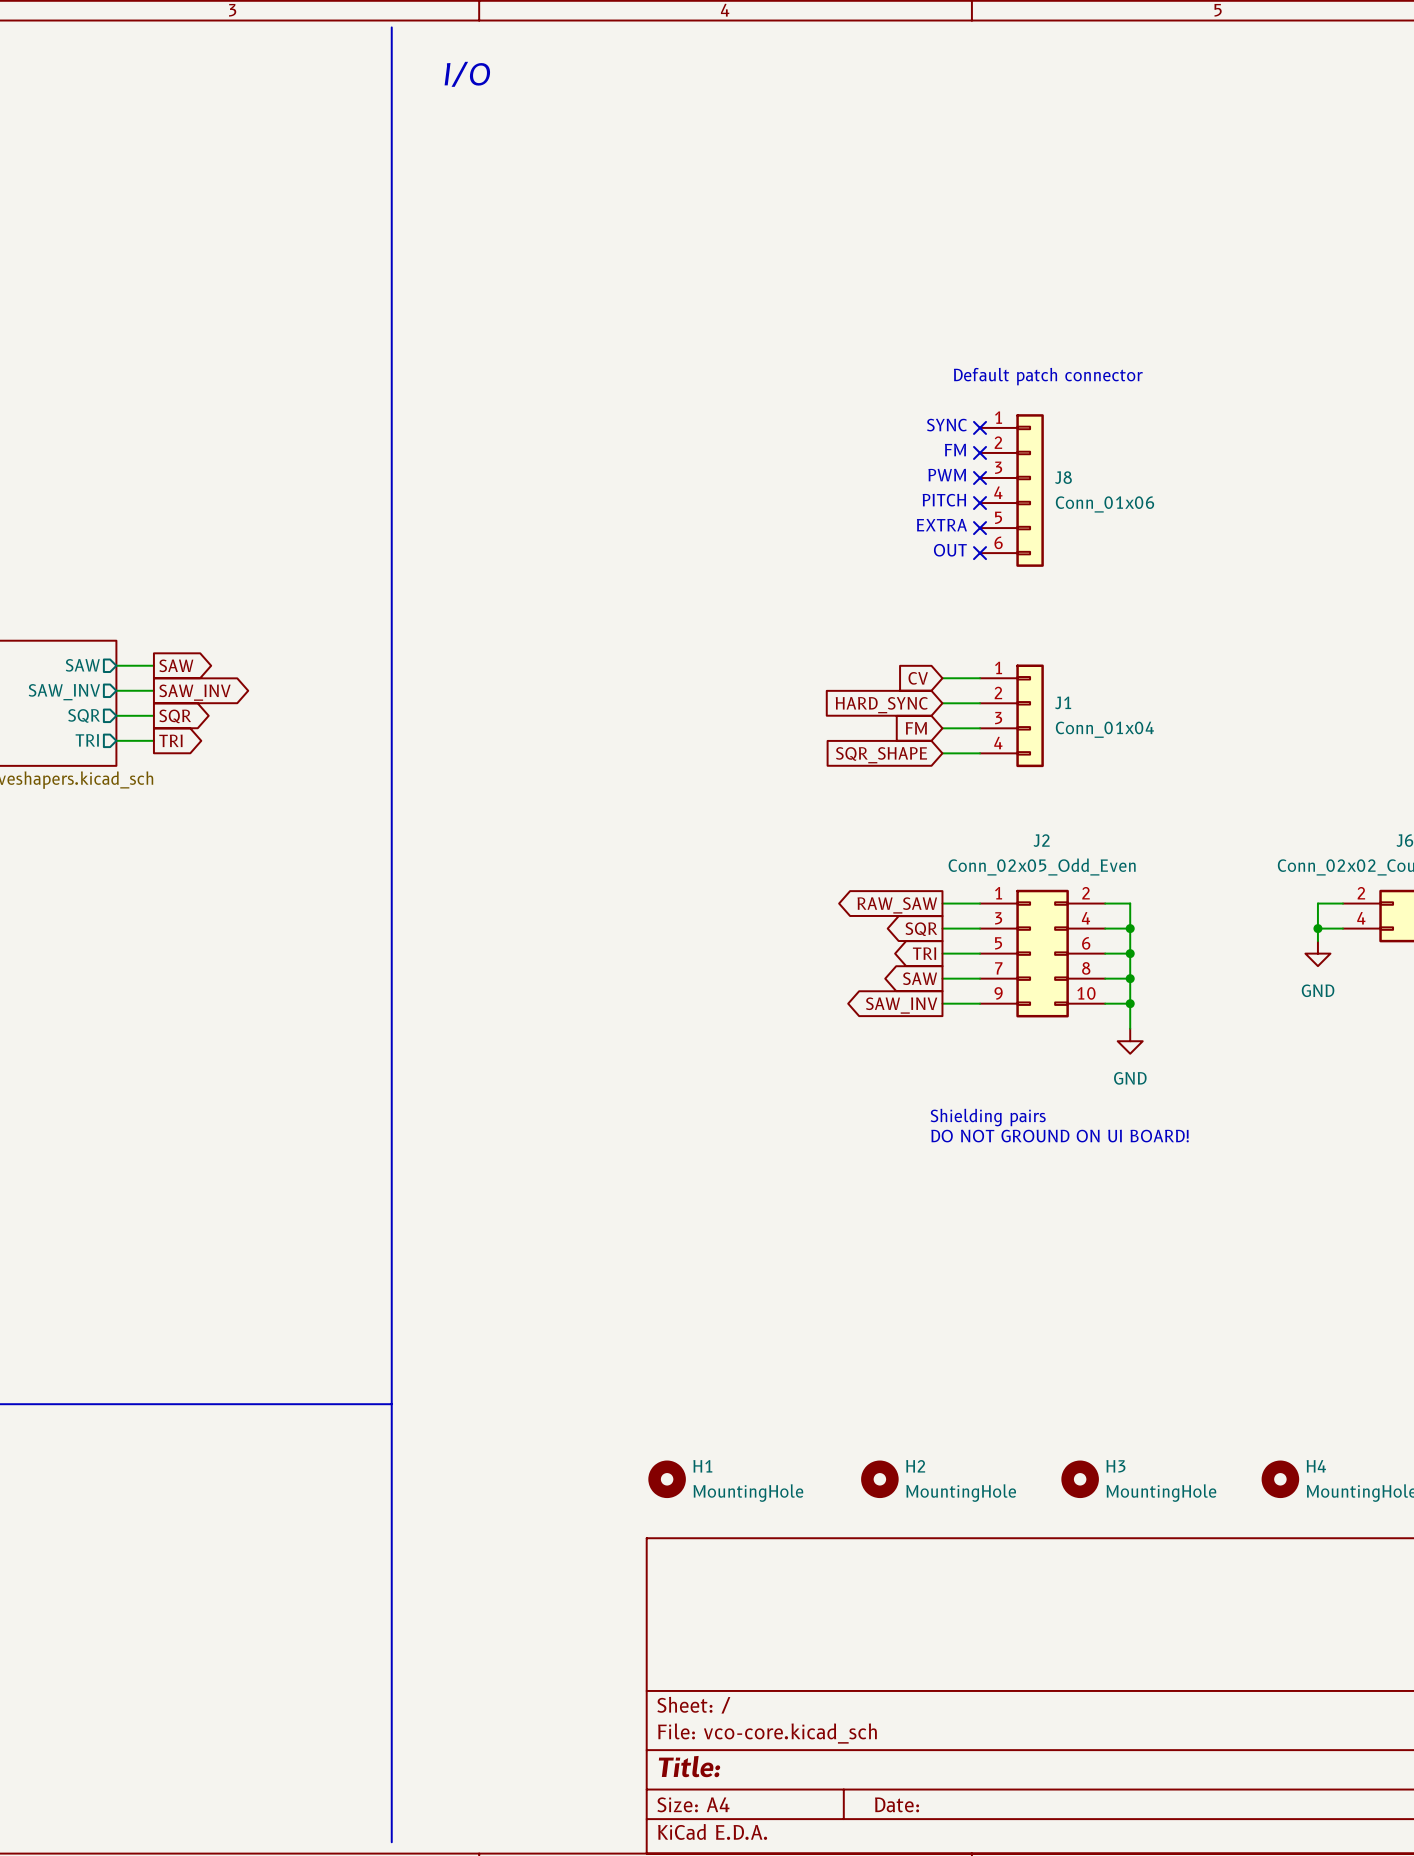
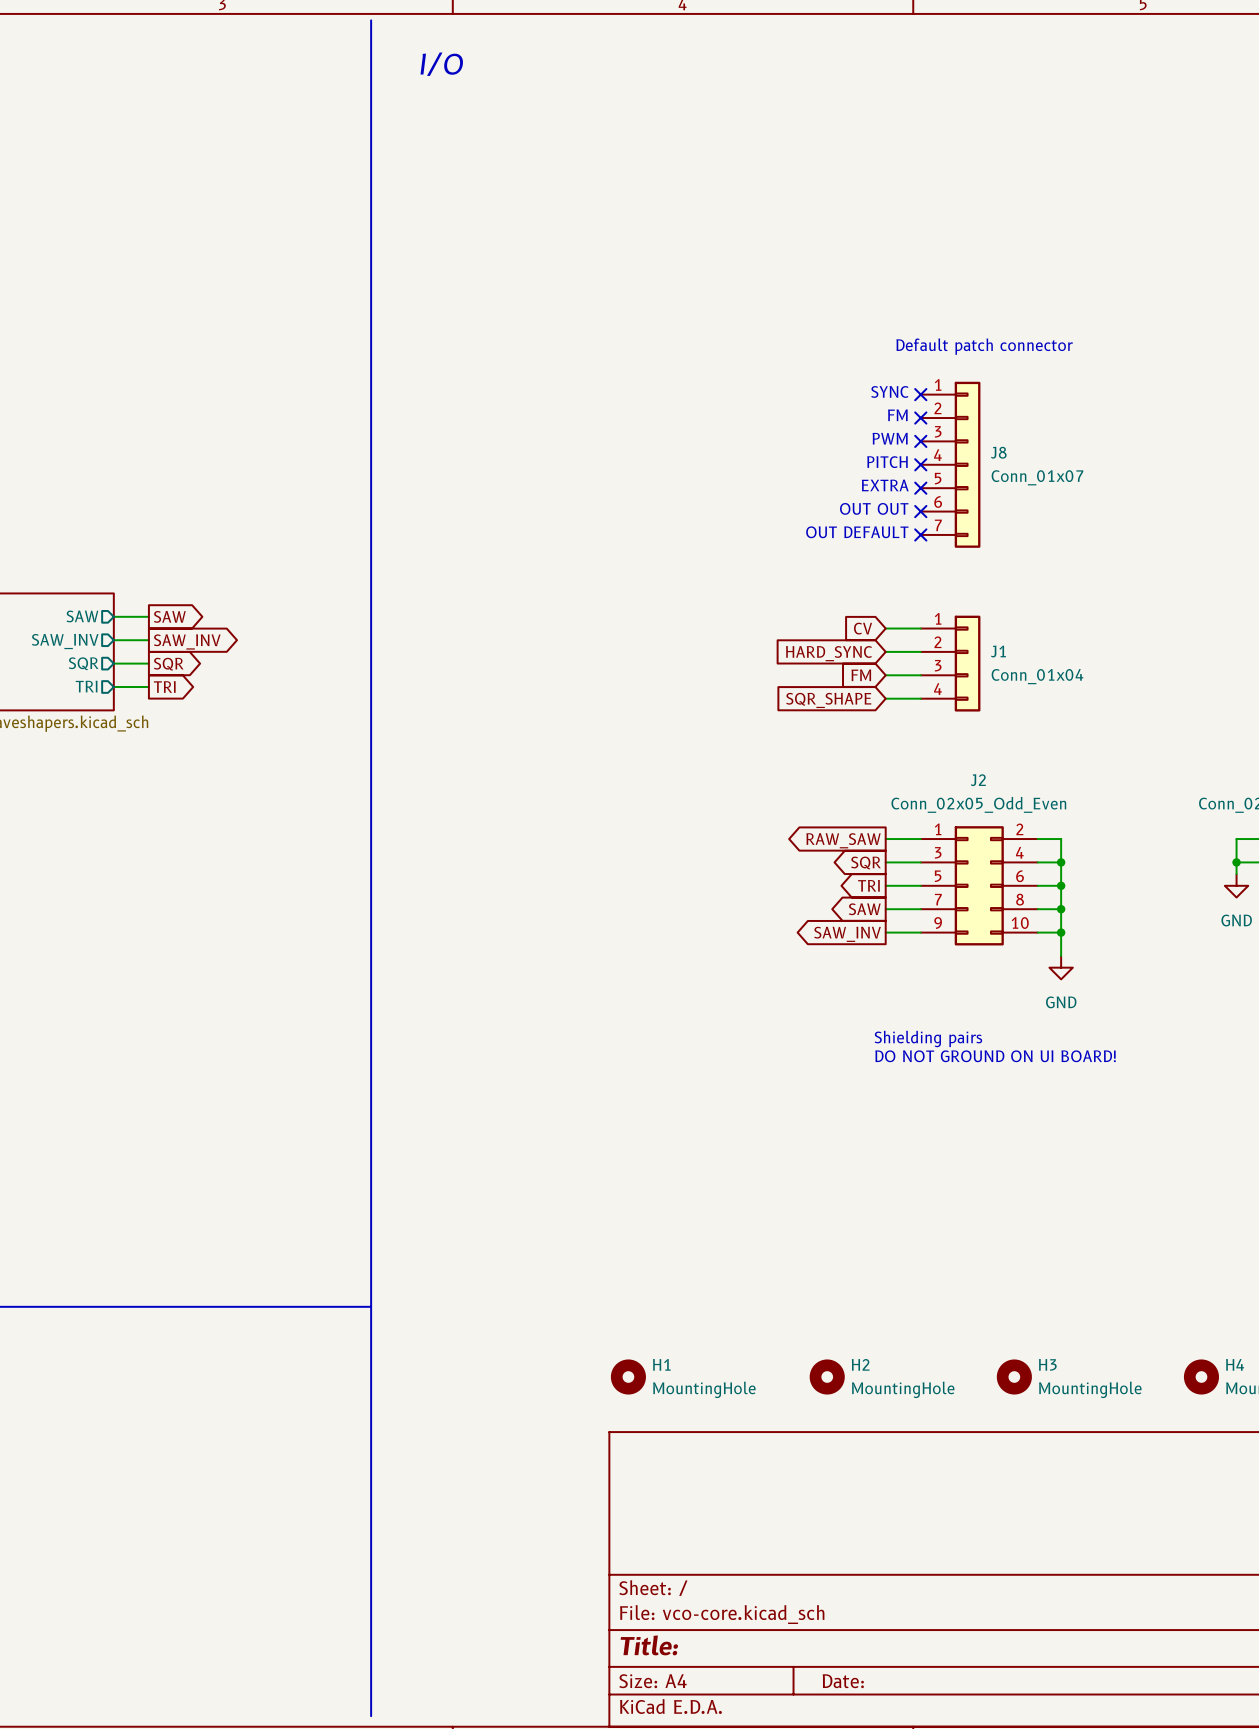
J8 symbol: [980, 414, 1044, 567] -> [920, 381, 981, 548]
J8 value: Conn_01x06 (1104, 504) -> Conn_01x07 (1037, 477)
text: OUT (950, 550) -> OUT OUT (874, 508)
text: none -> OUT DEFAULT (857, 532)
no-connect mark: none -> (920, 534)

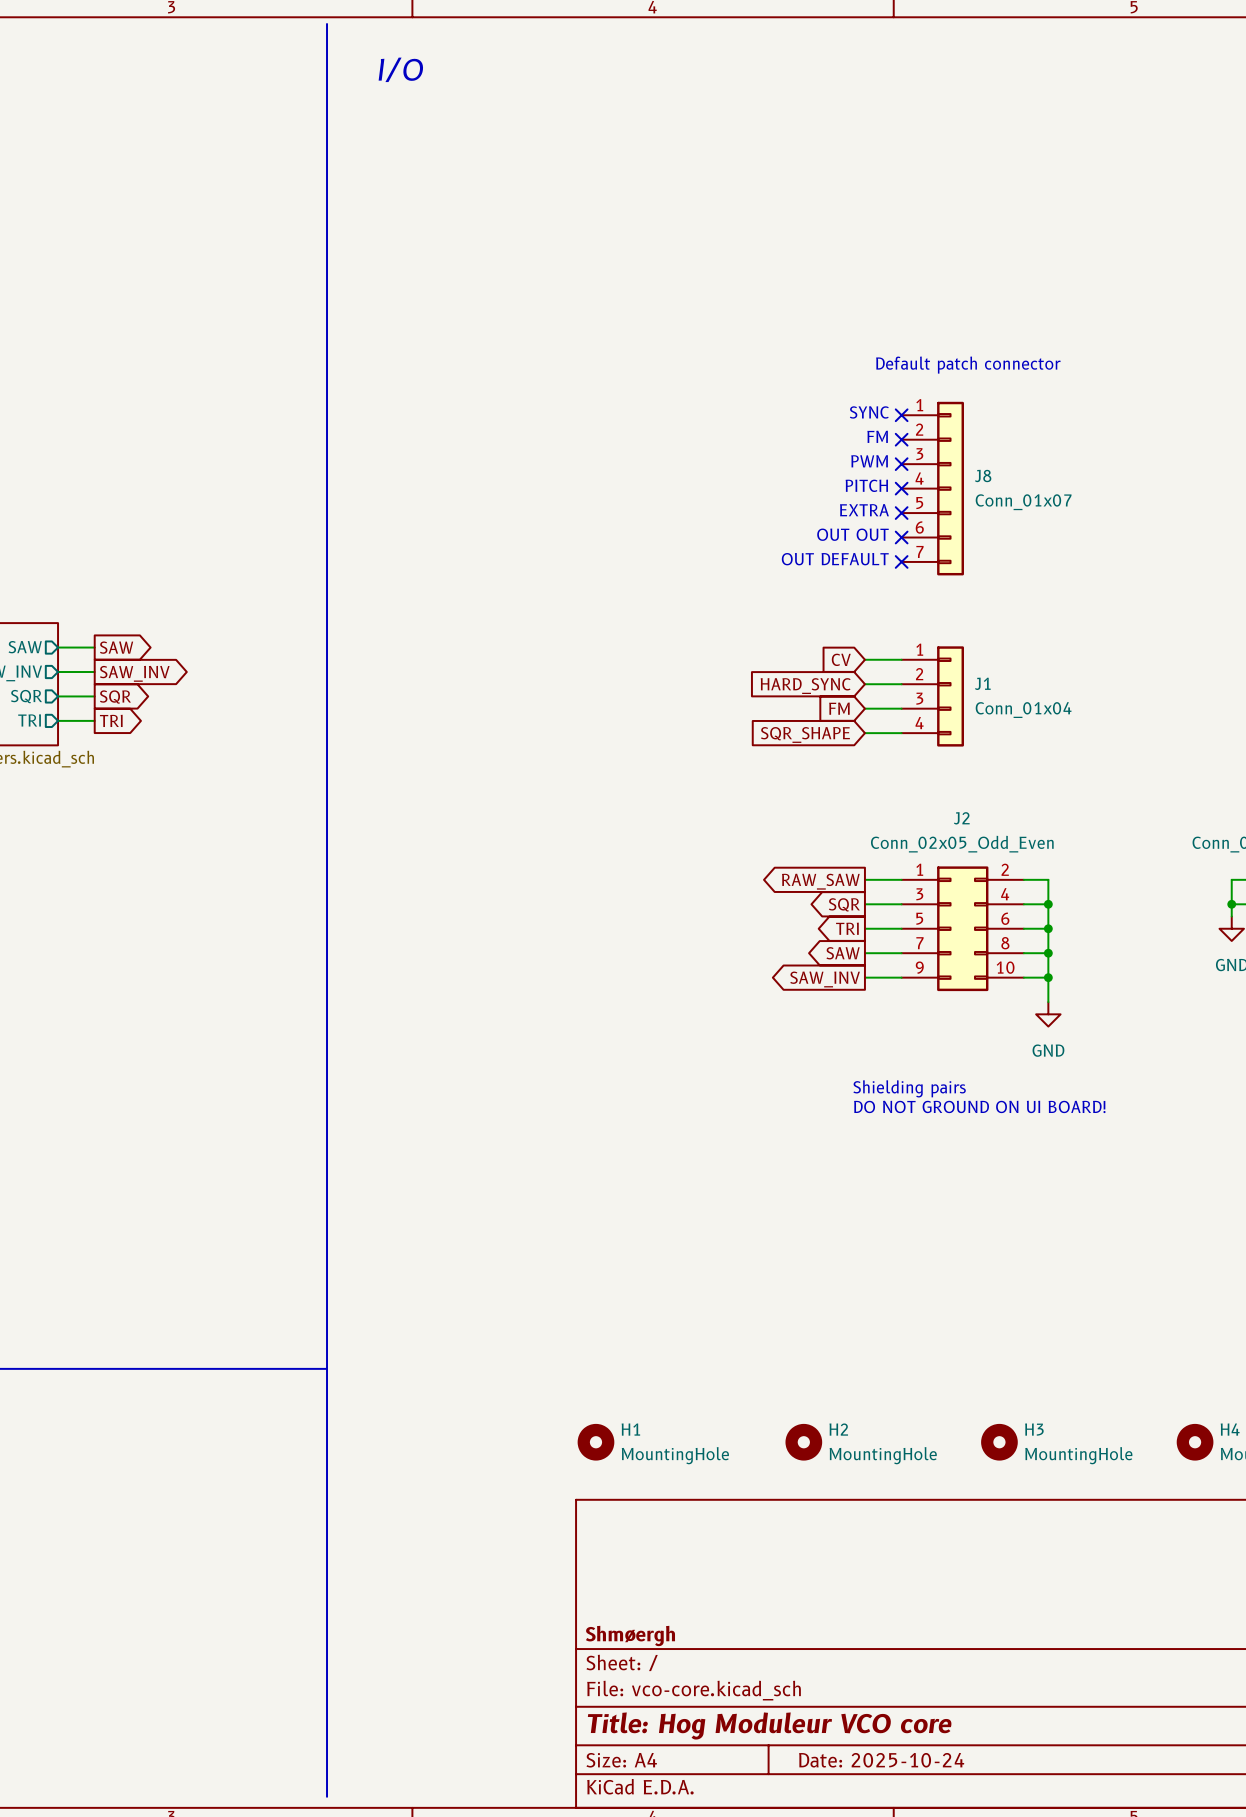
title block: none -> Shmøergh (630, 1636)
title block: Title: (649, 1645) -> Title: Hog Moduleur VCO core (769, 1725)
title block: Date: (843, 1681) -> Date: 2025-10-24 (881, 1760)

